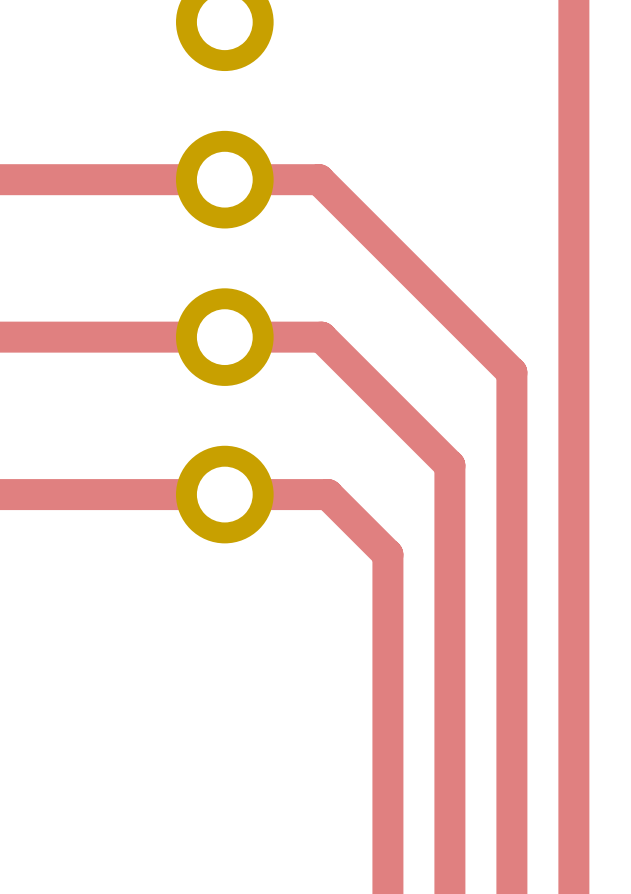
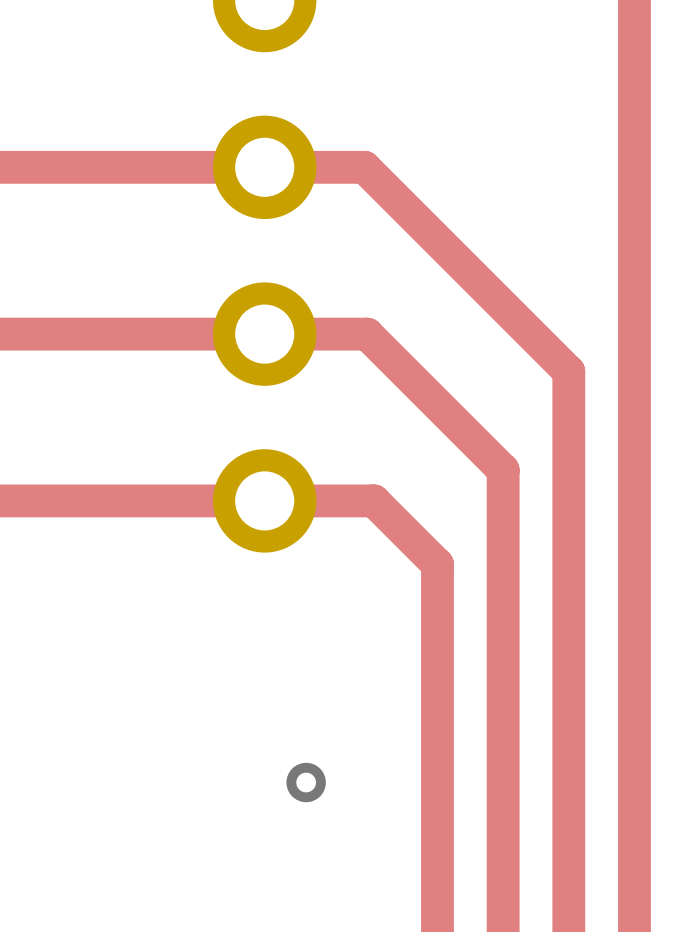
via: none -> (306, 782)

